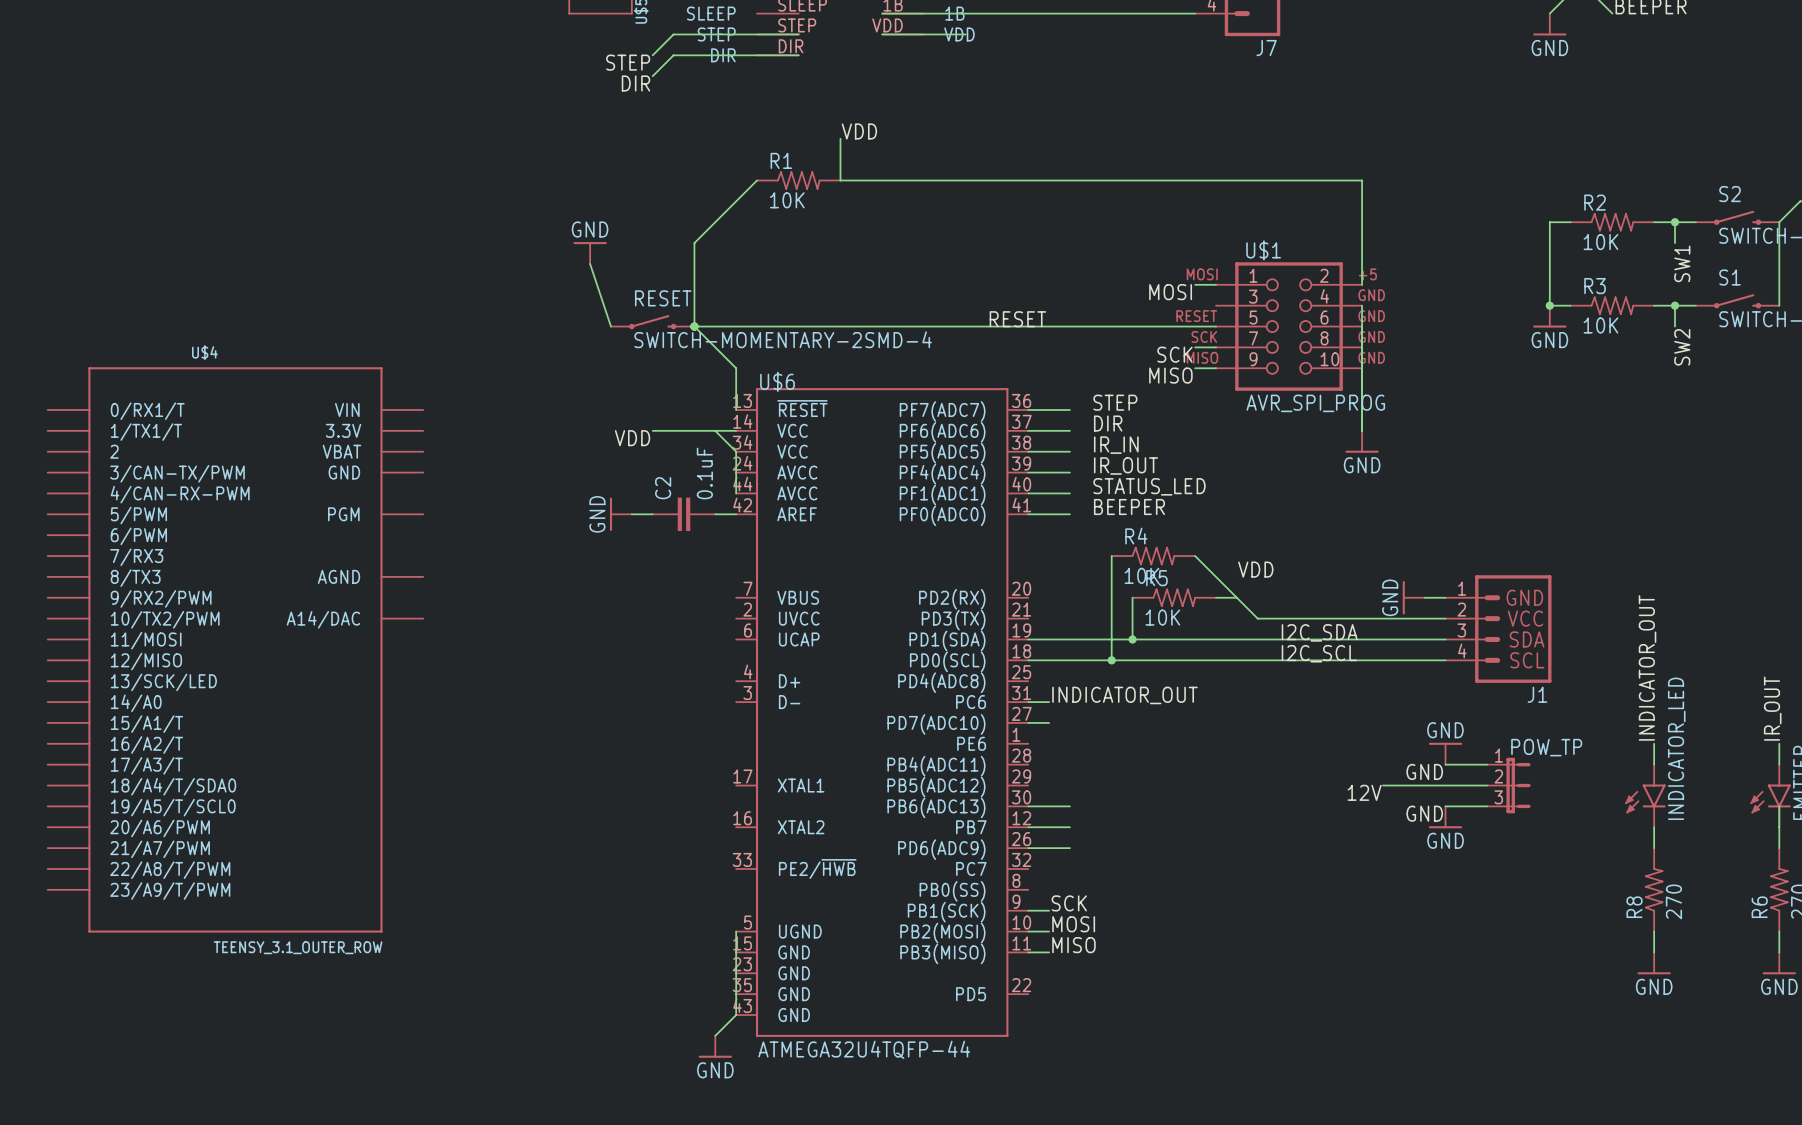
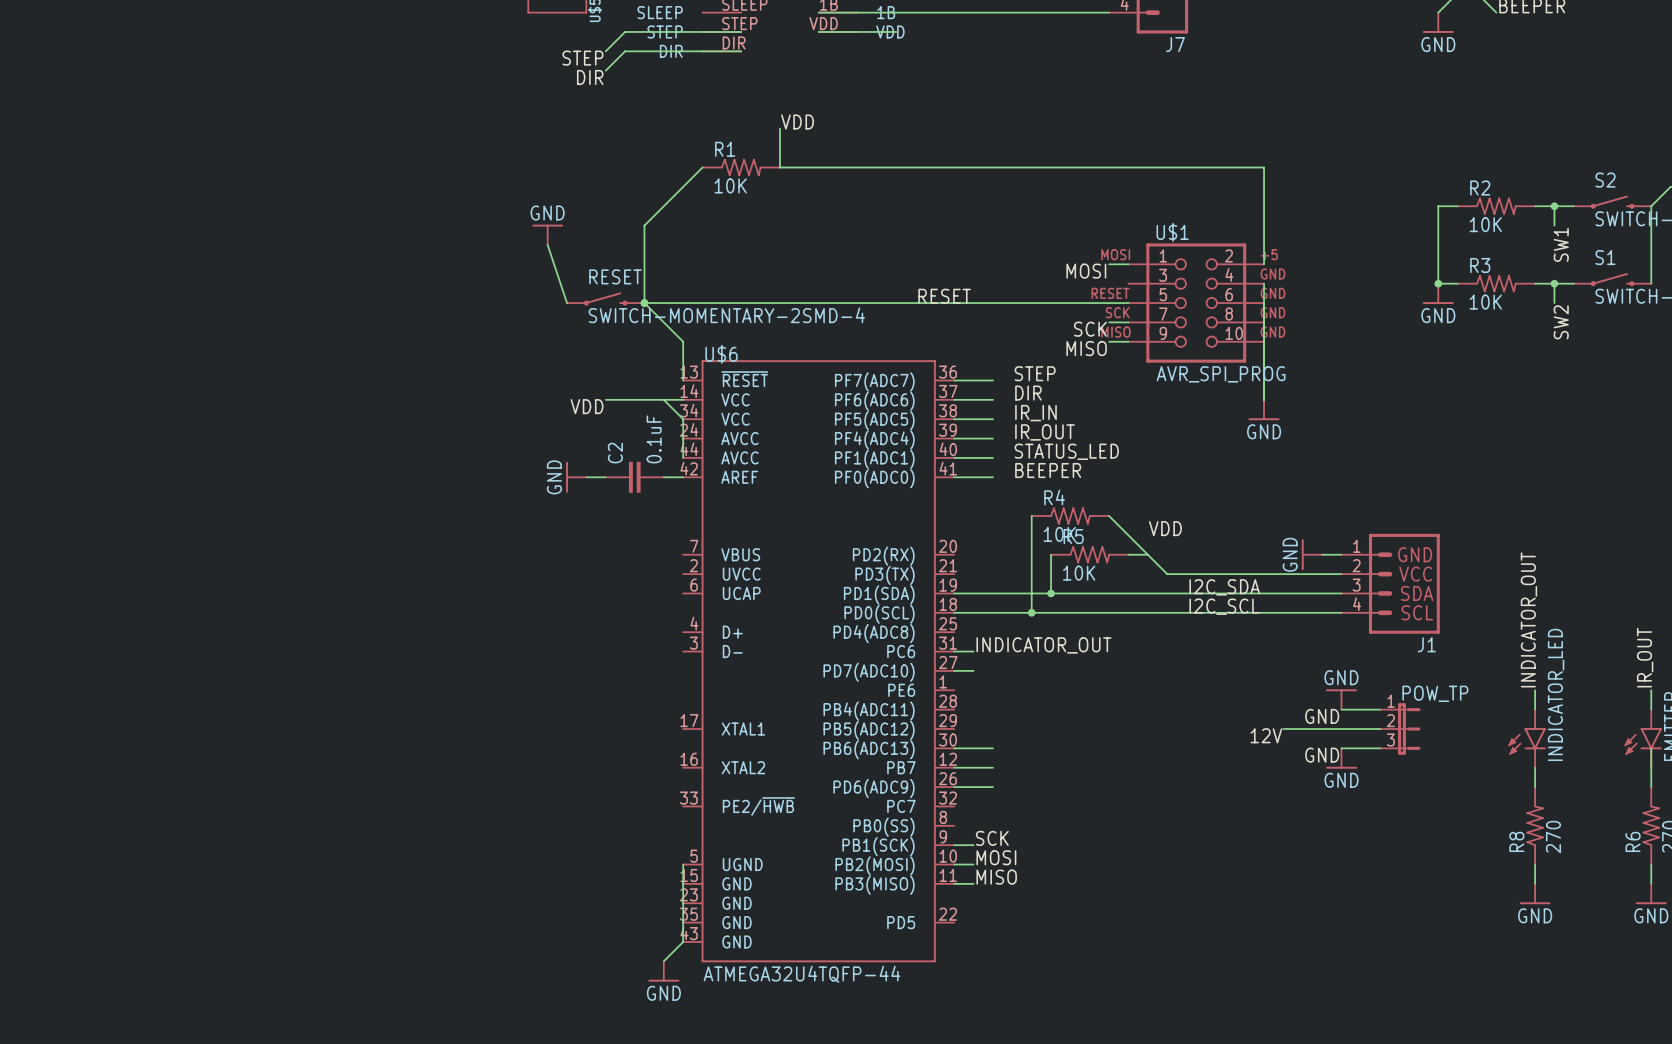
U$4: TEENSY_3.1_OUTER_ROW (235, 649) -> none

